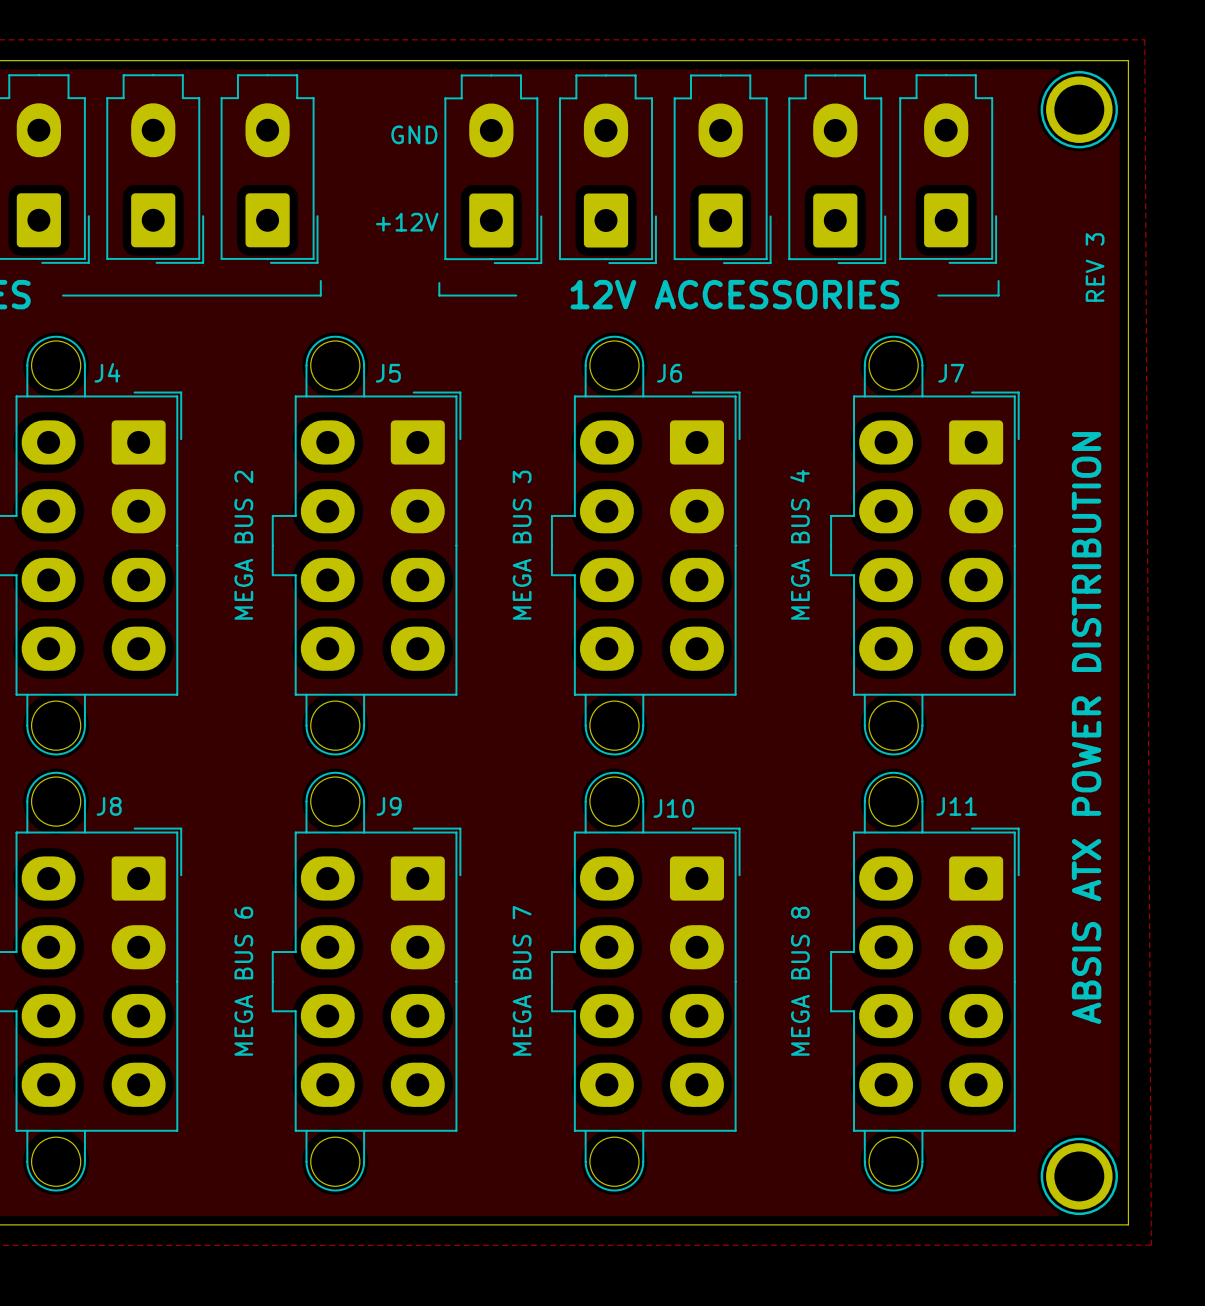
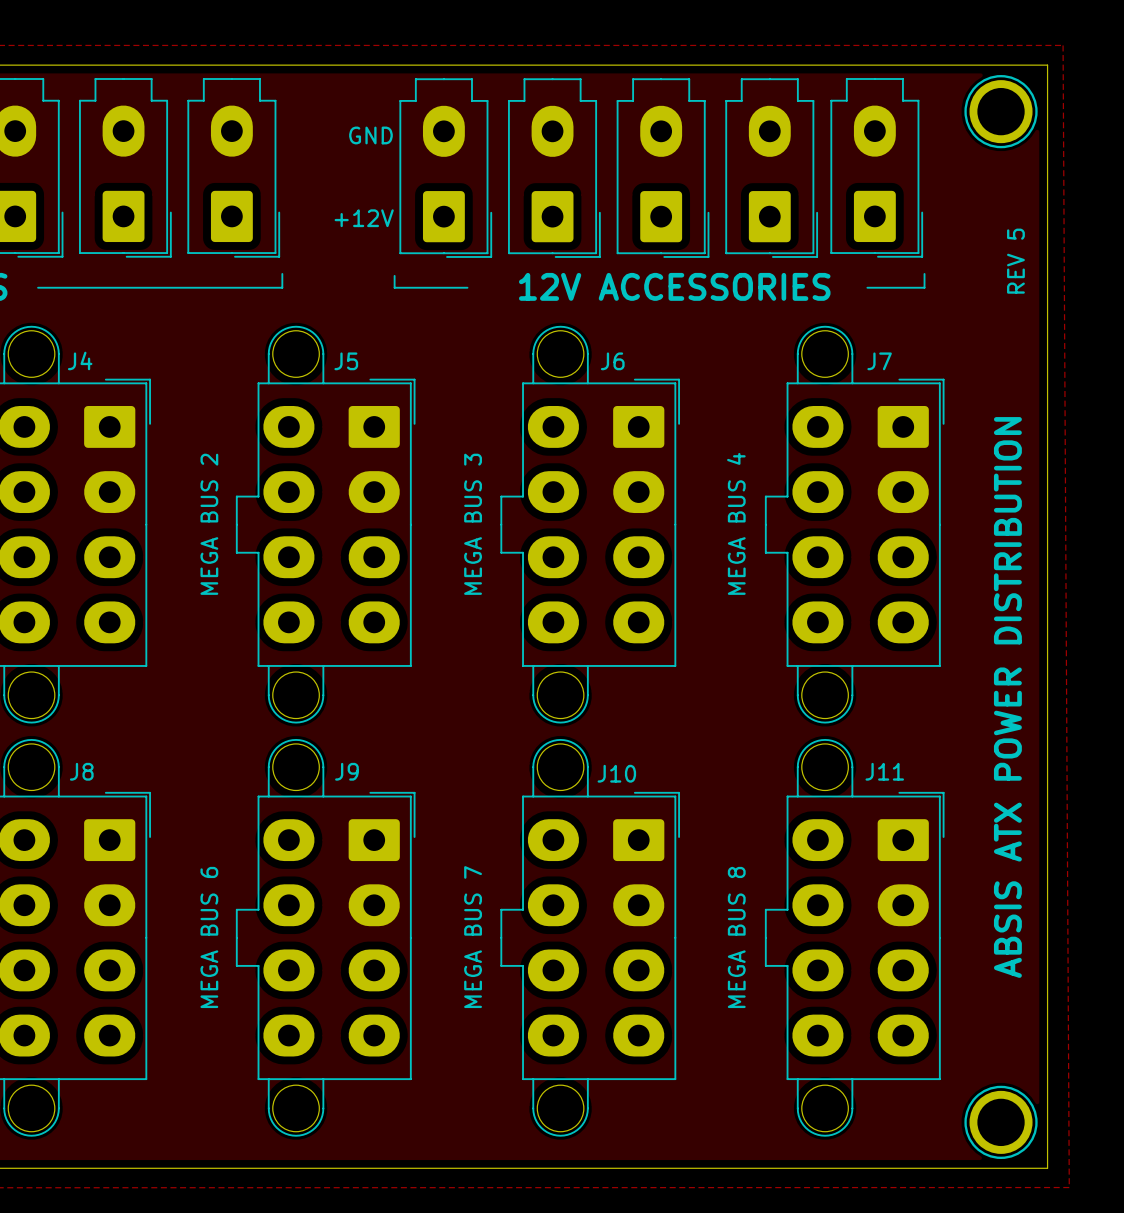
text: REV 3 (1095, 267) -> REV 5 (1015, 261)

